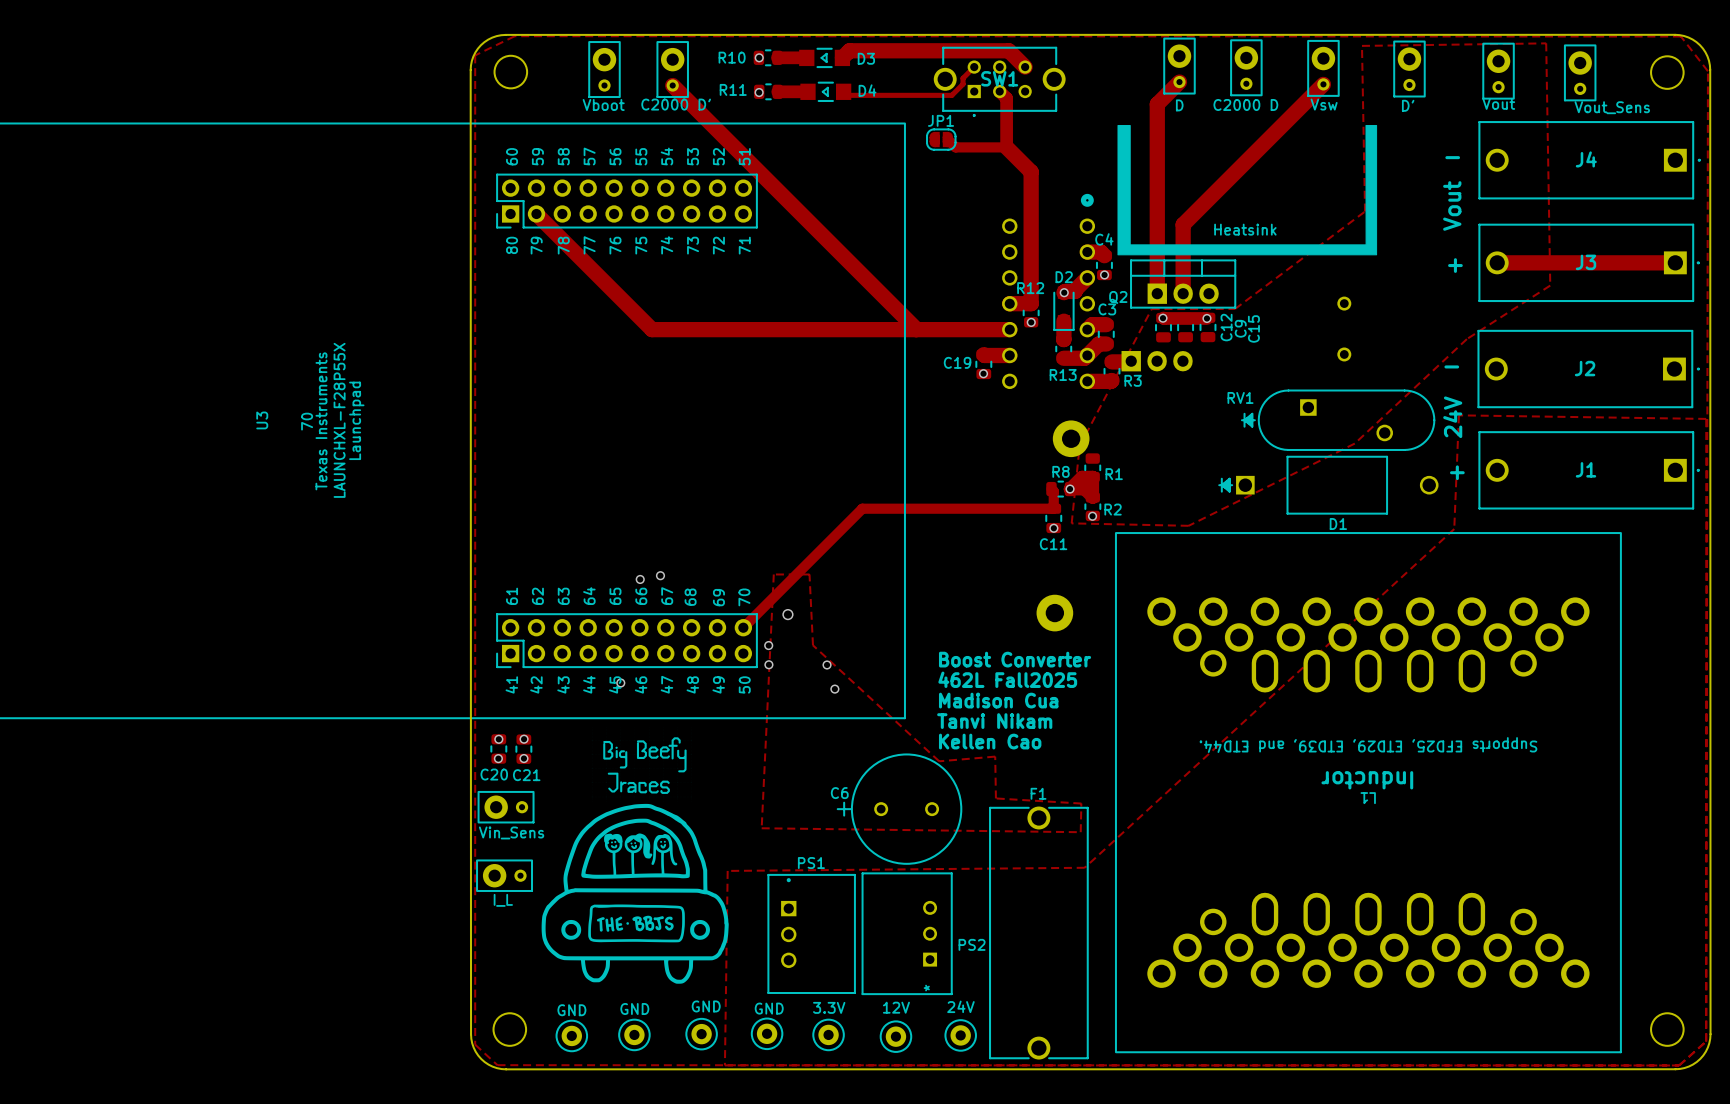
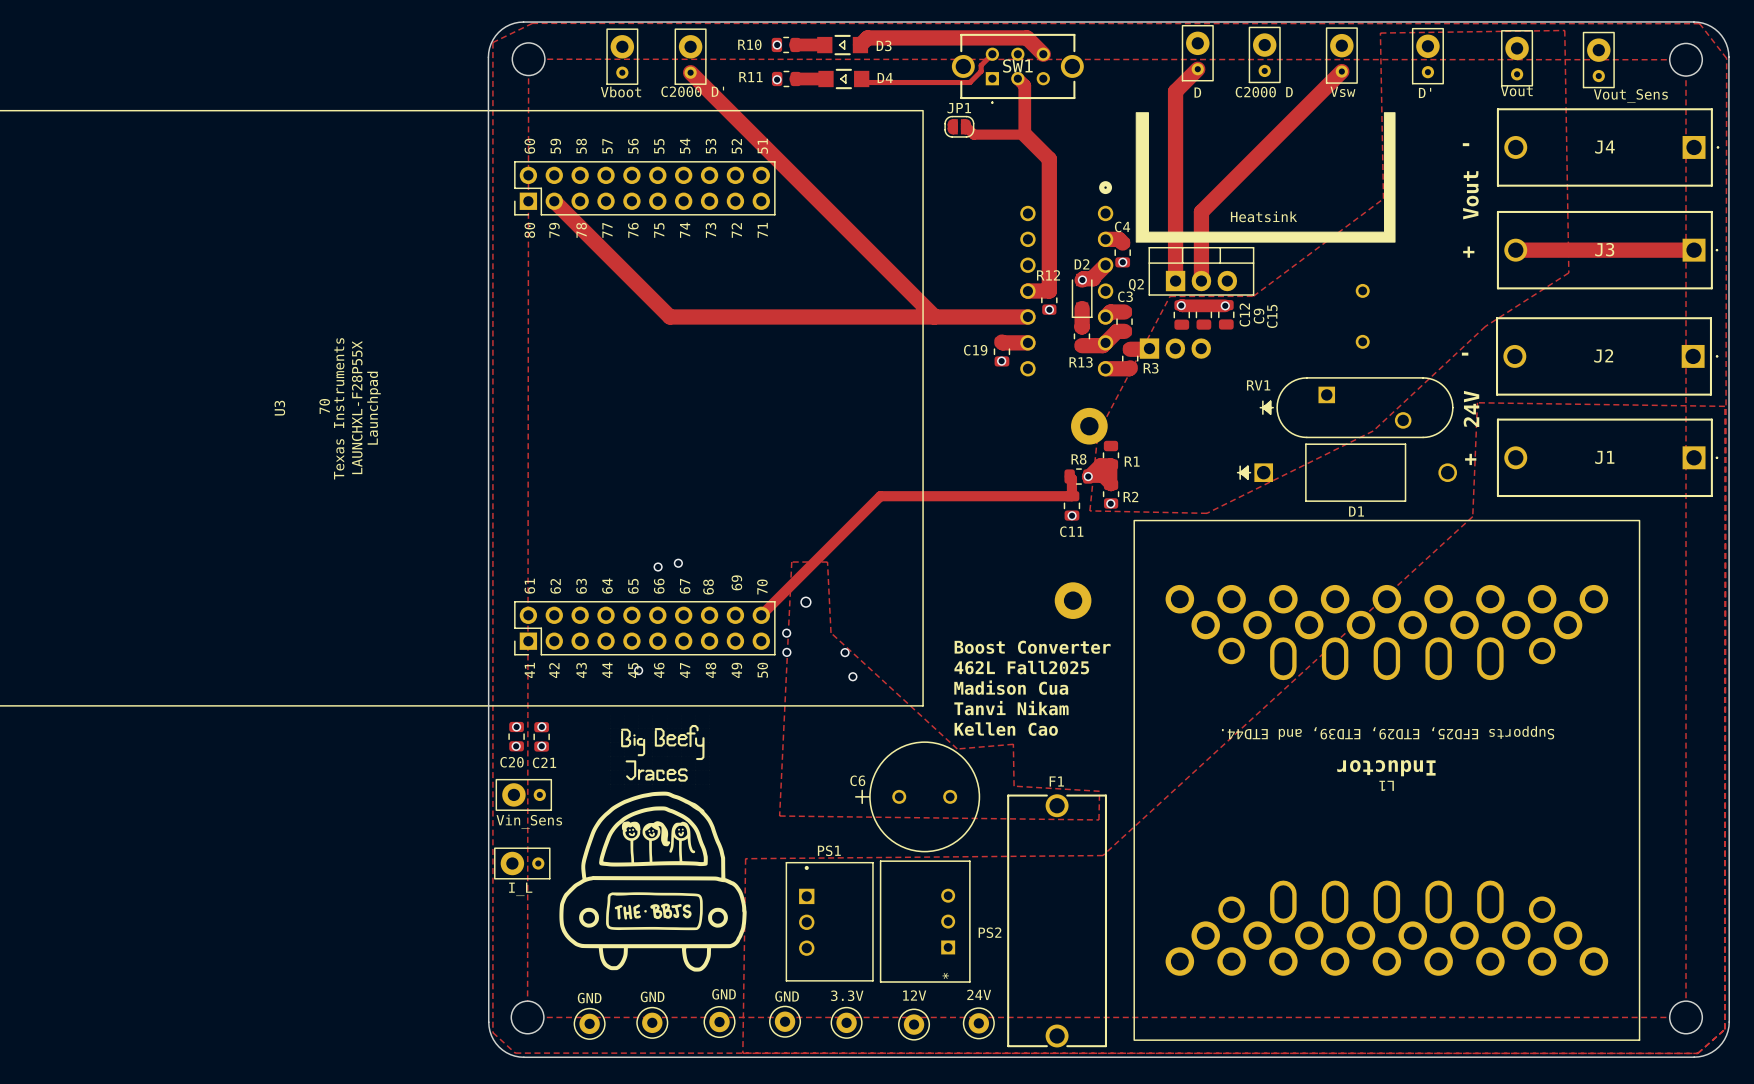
zone outline: none -> (528, 59) (527, 1017) (1686, 1017) (1686, 59) (528, 59)

